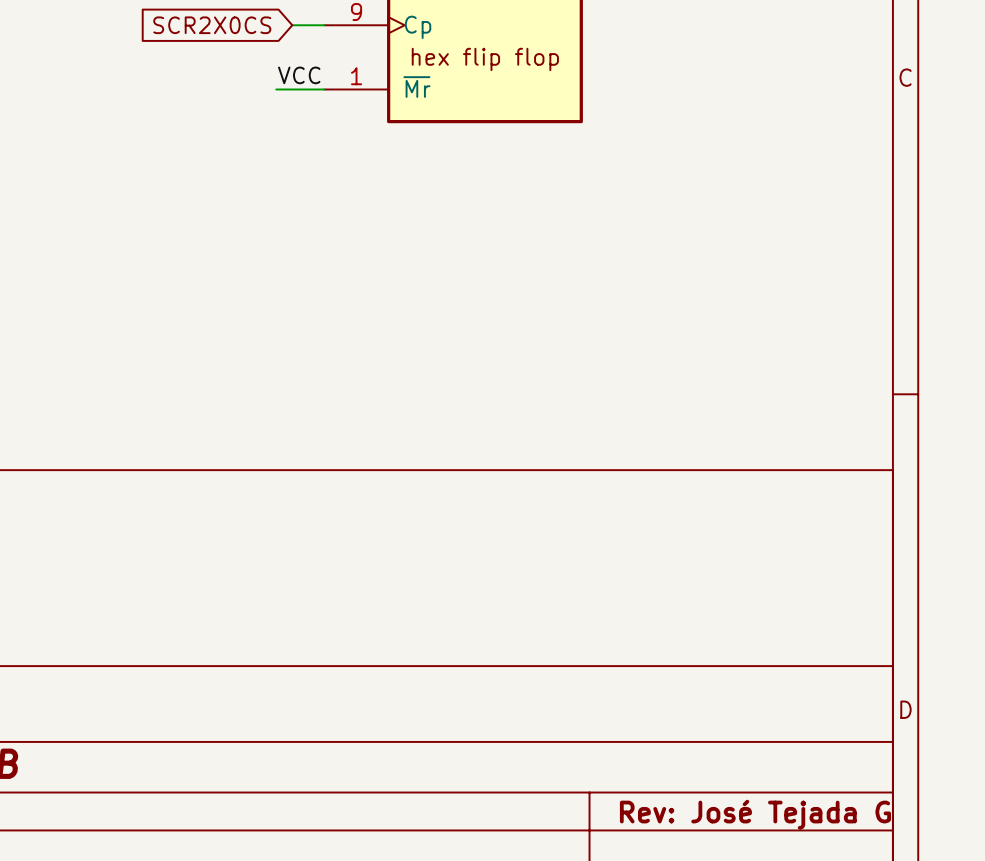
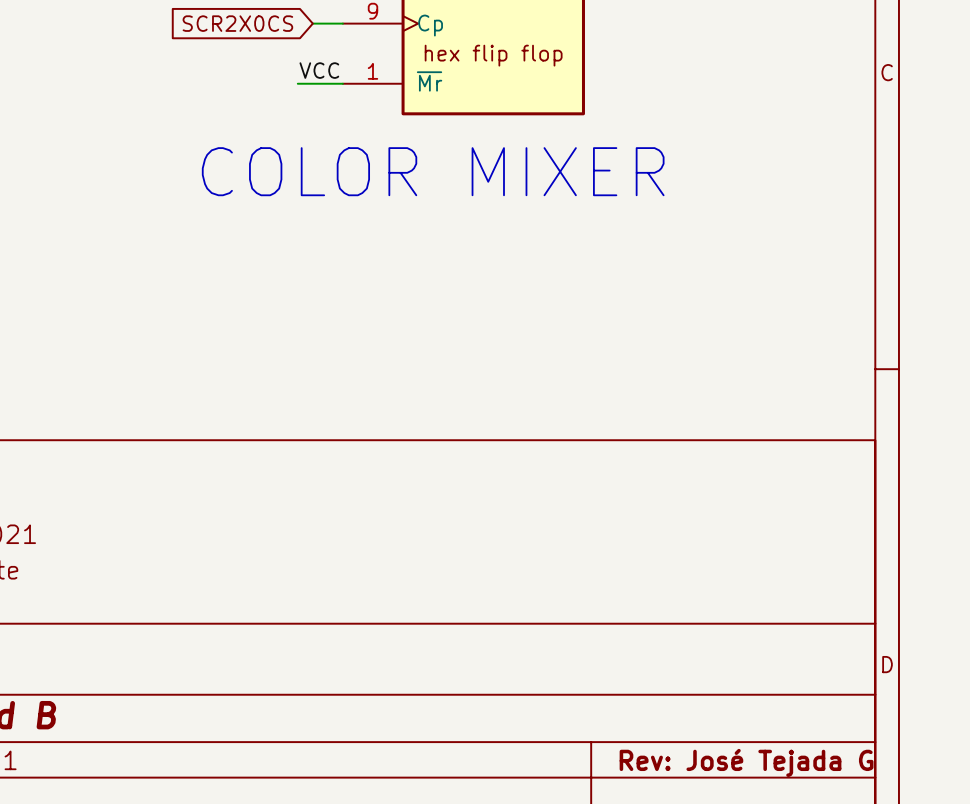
text: none -> COLOR MIXER (433, 171)

